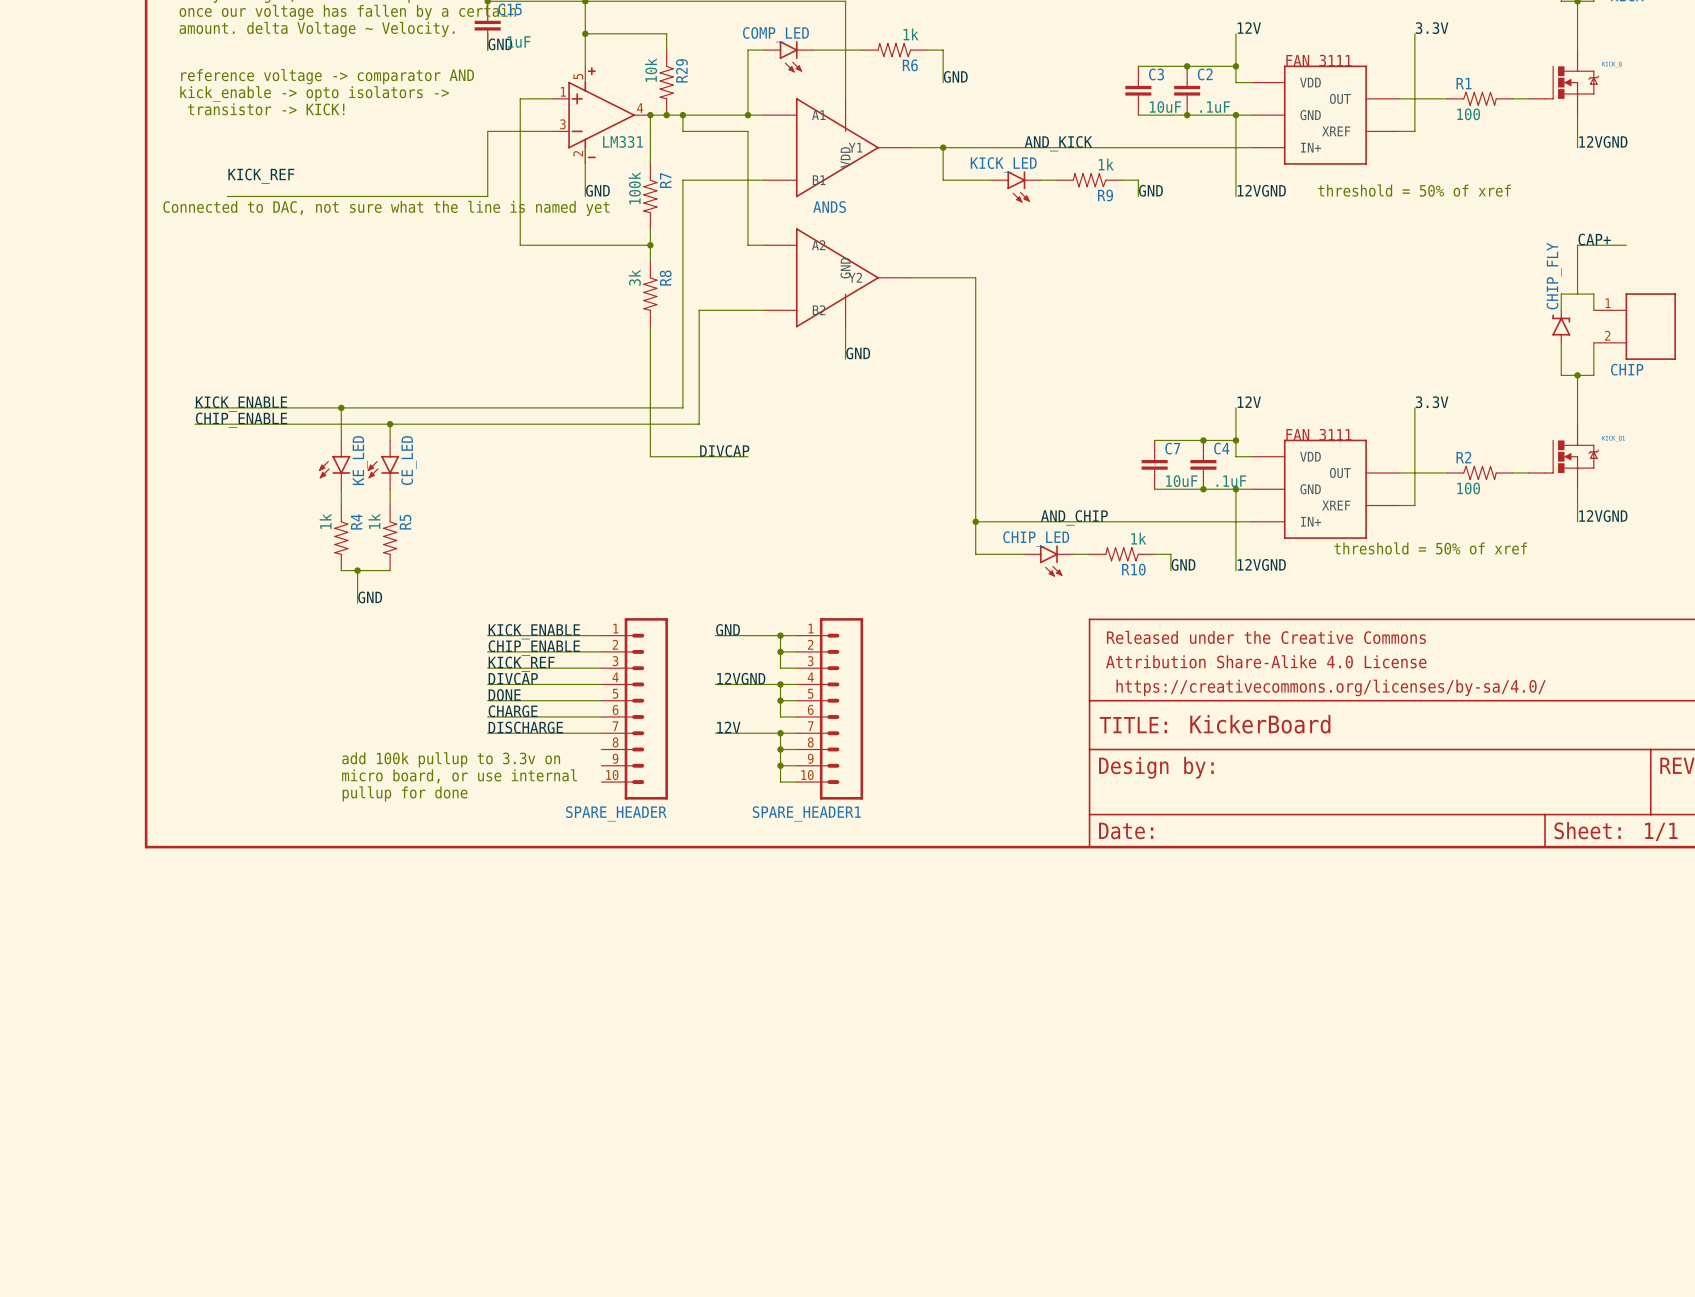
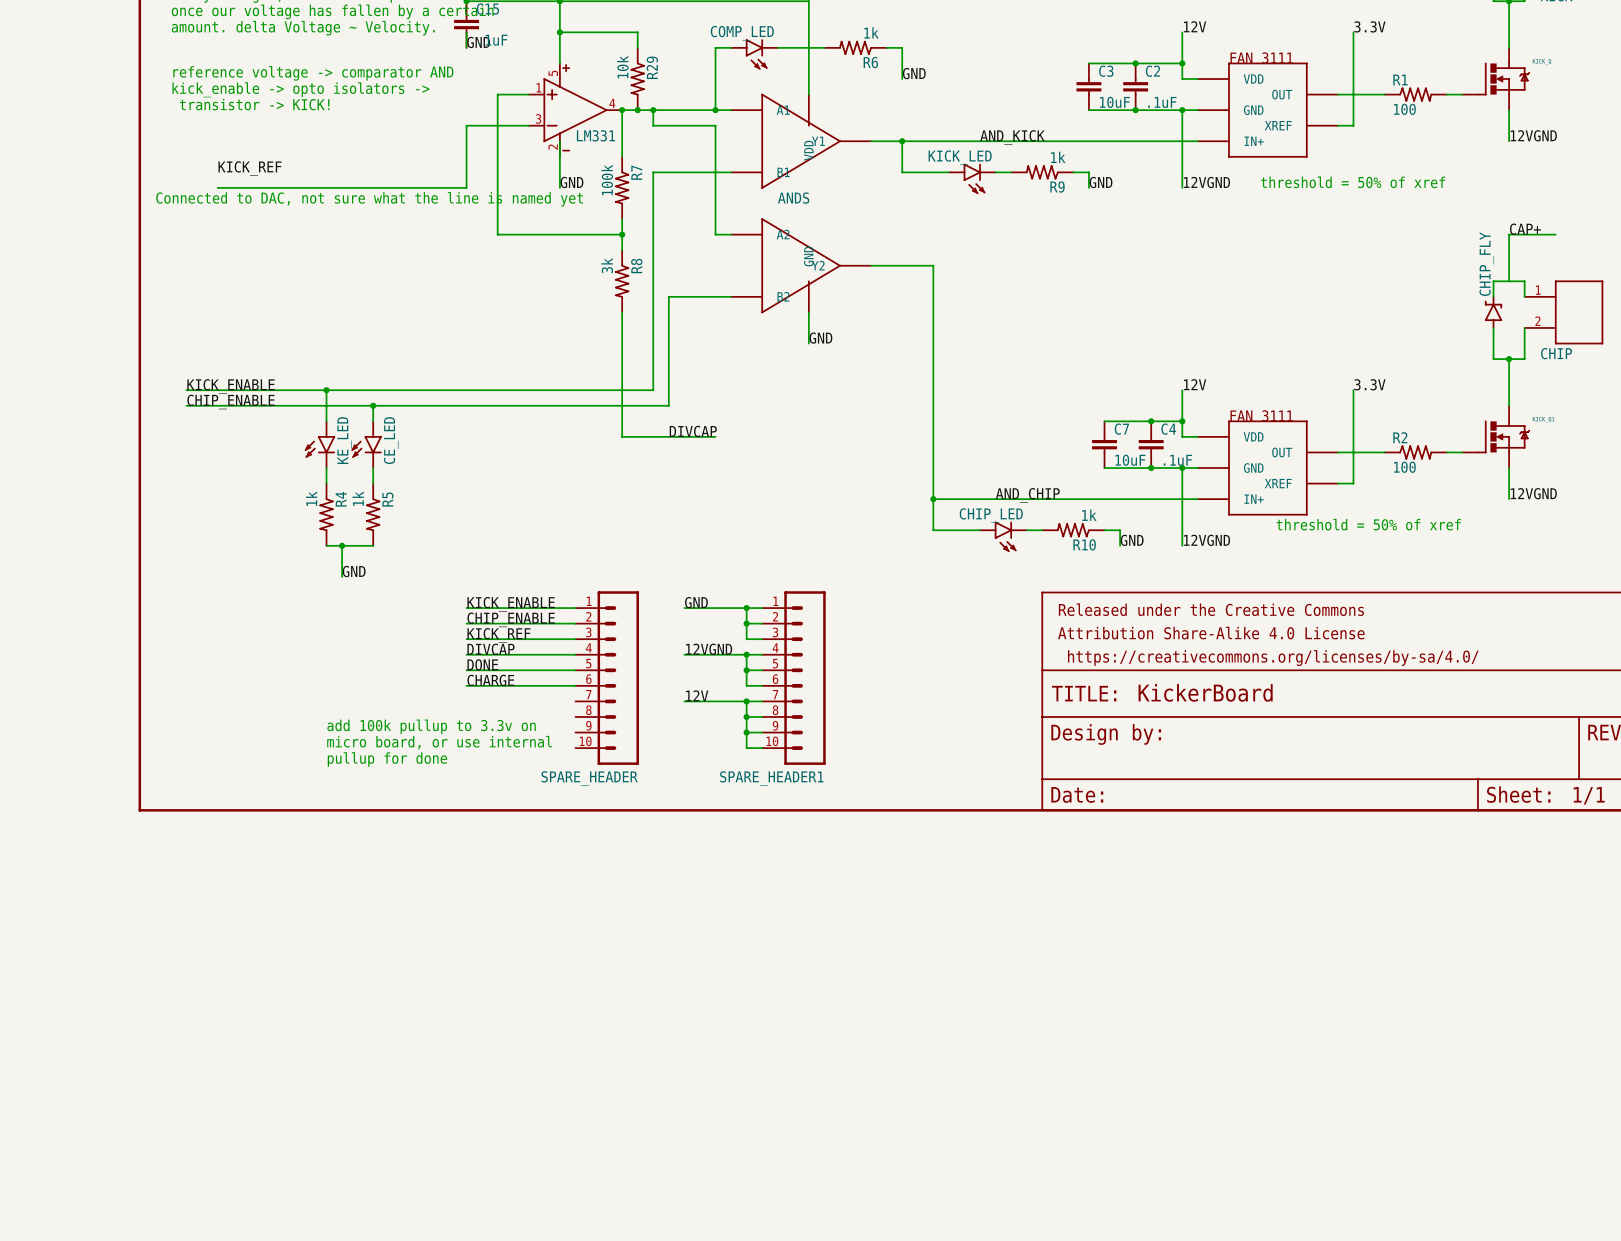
label: DISCHARGE (525, 727) -> none
wire: (487, 733) (601, 733) -> none

